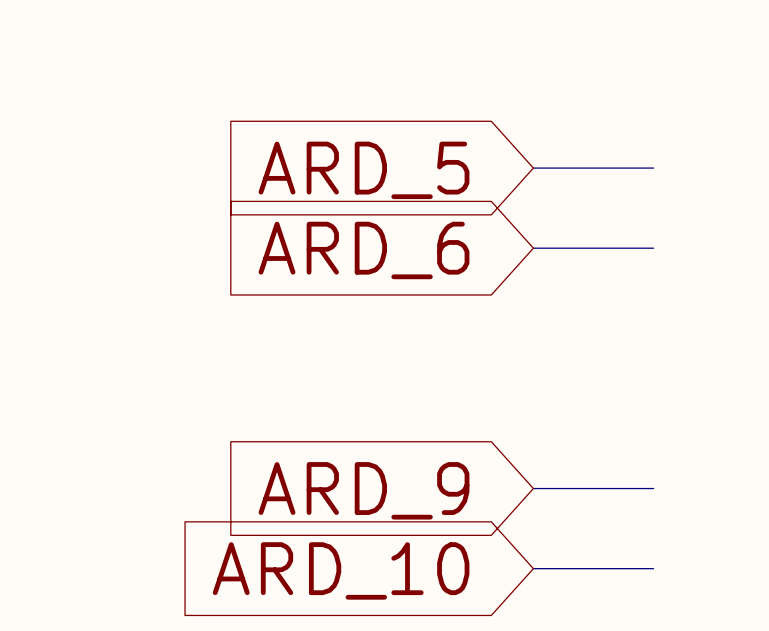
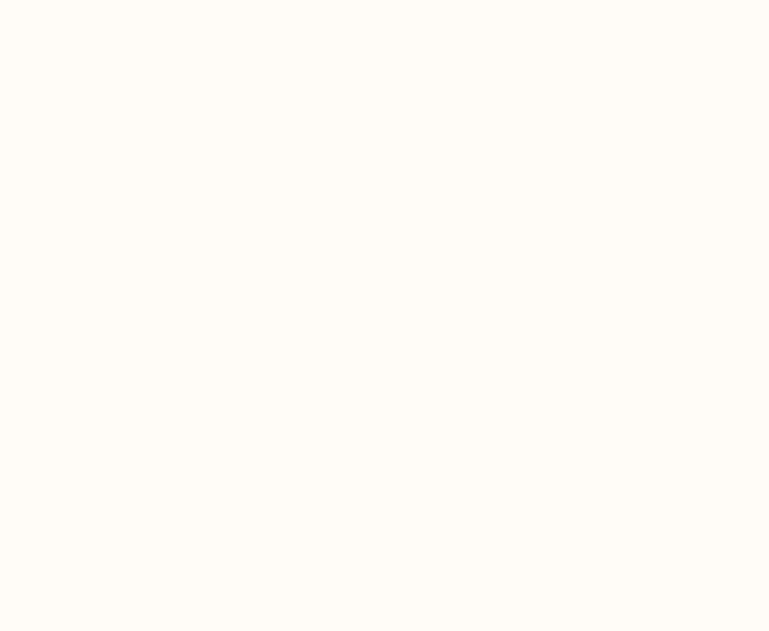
wire: (533, 168) (653, 168) -> none
global label: ARD_5 (364, 170) -> none
wire: (533, 248) (653, 248) -> none
global label: ARD_6 (364, 250) -> none
wire: (533, 488) (653, 488) -> none
global label: ARD_9 (364, 490) -> none
wire: (533, 568) (653, 568) -> none
global label: ARD_10 (341, 570) -> none

